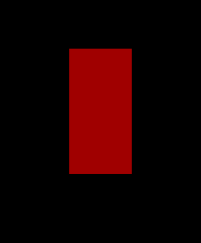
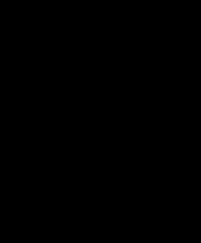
part: (100, 111) -> none

